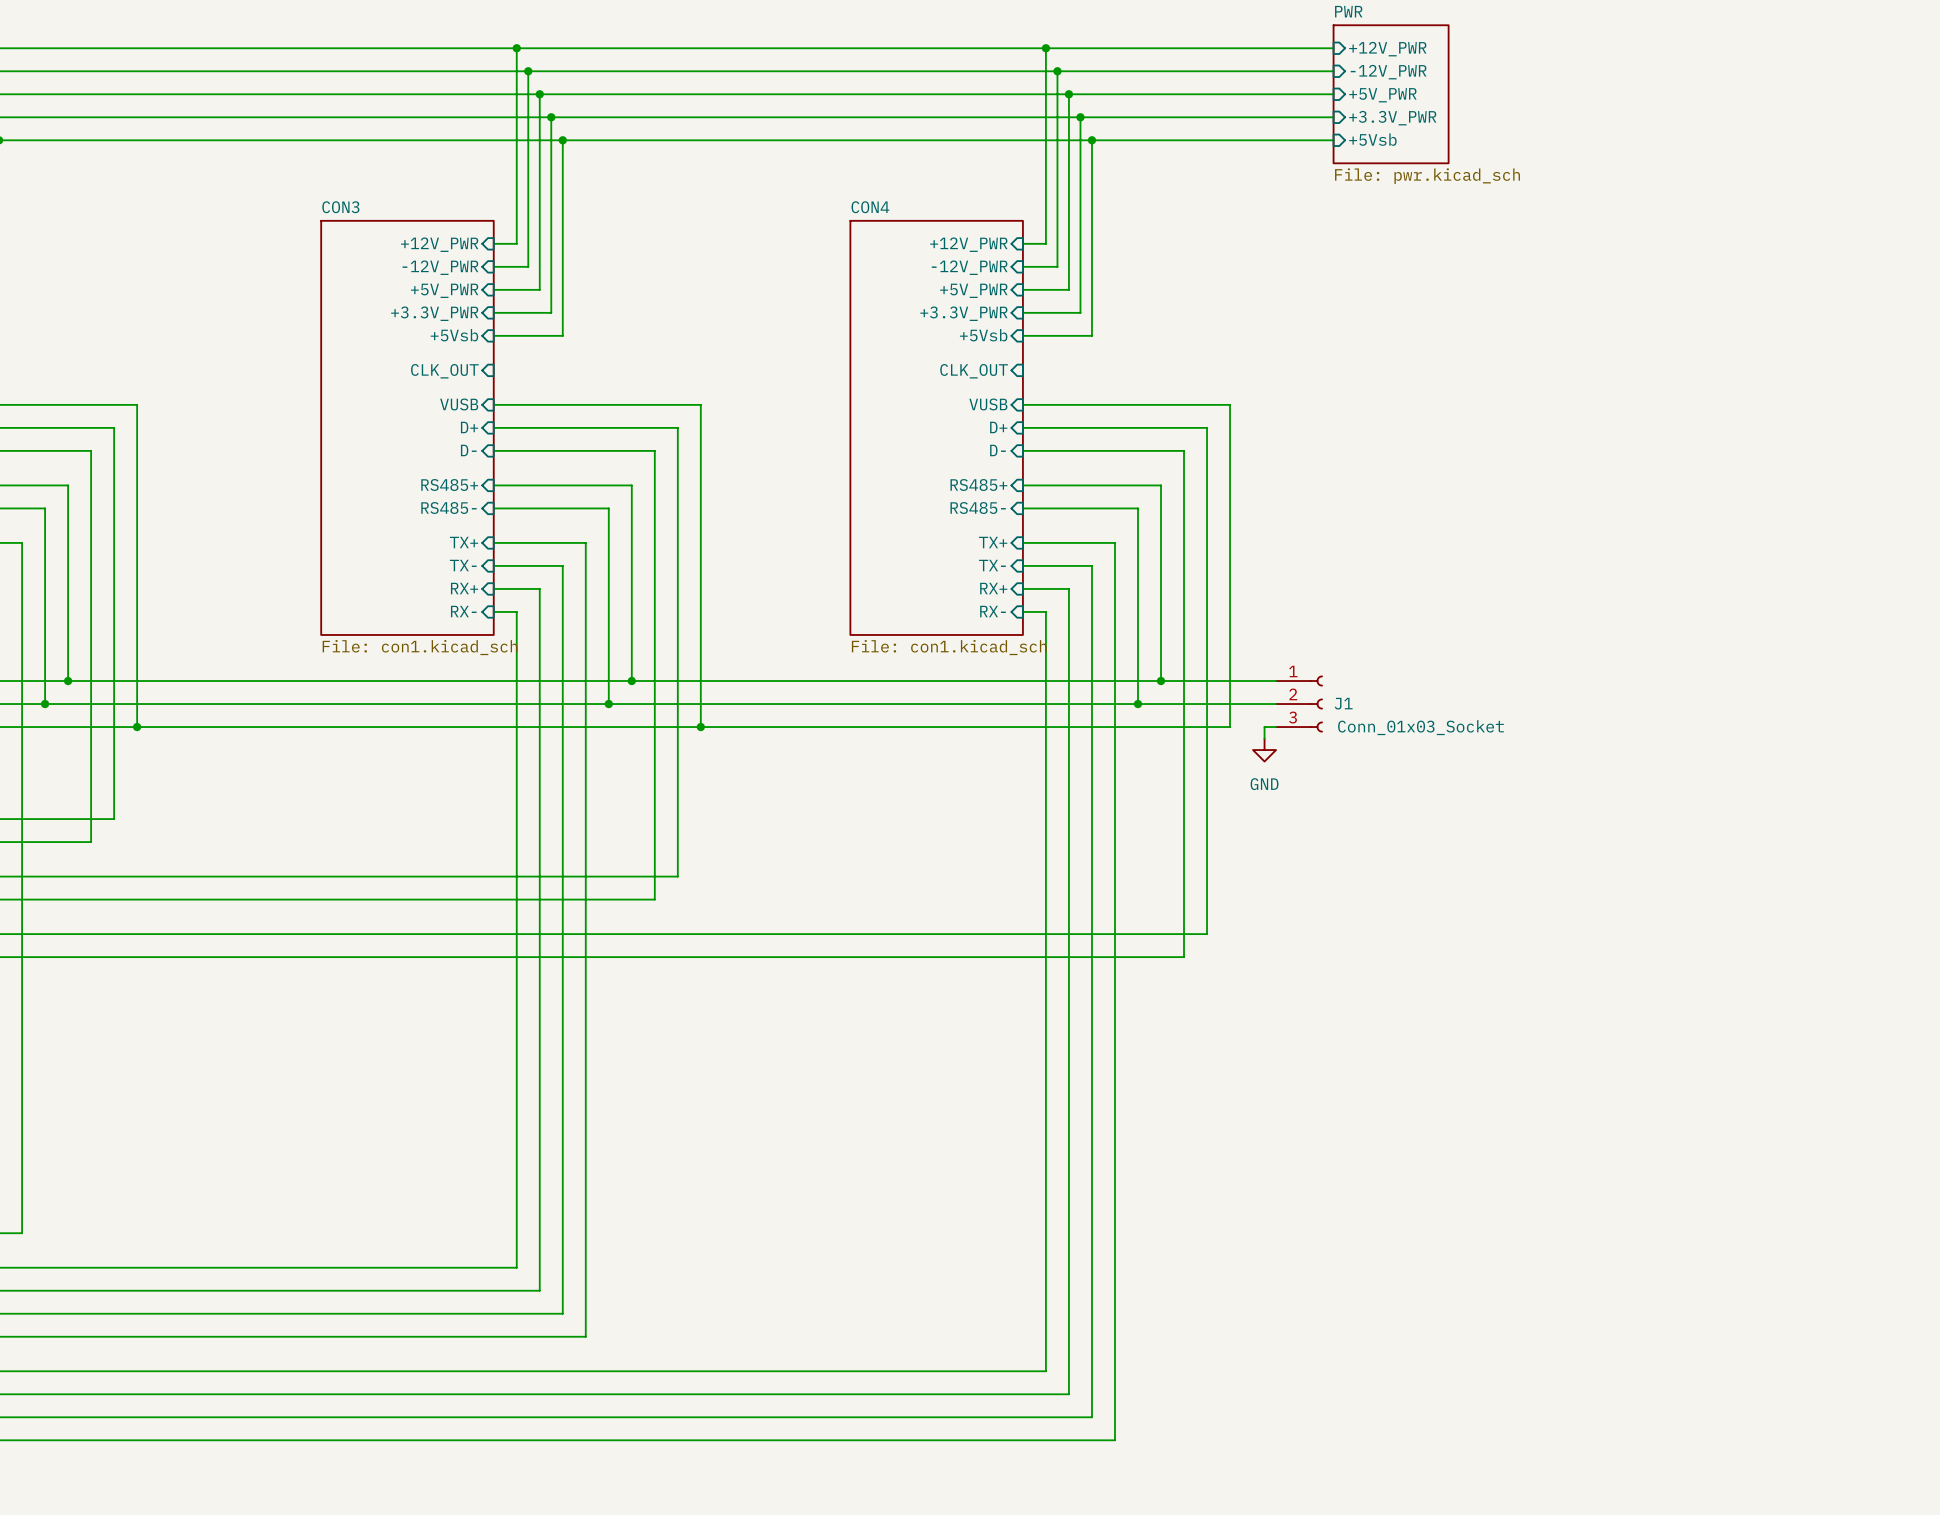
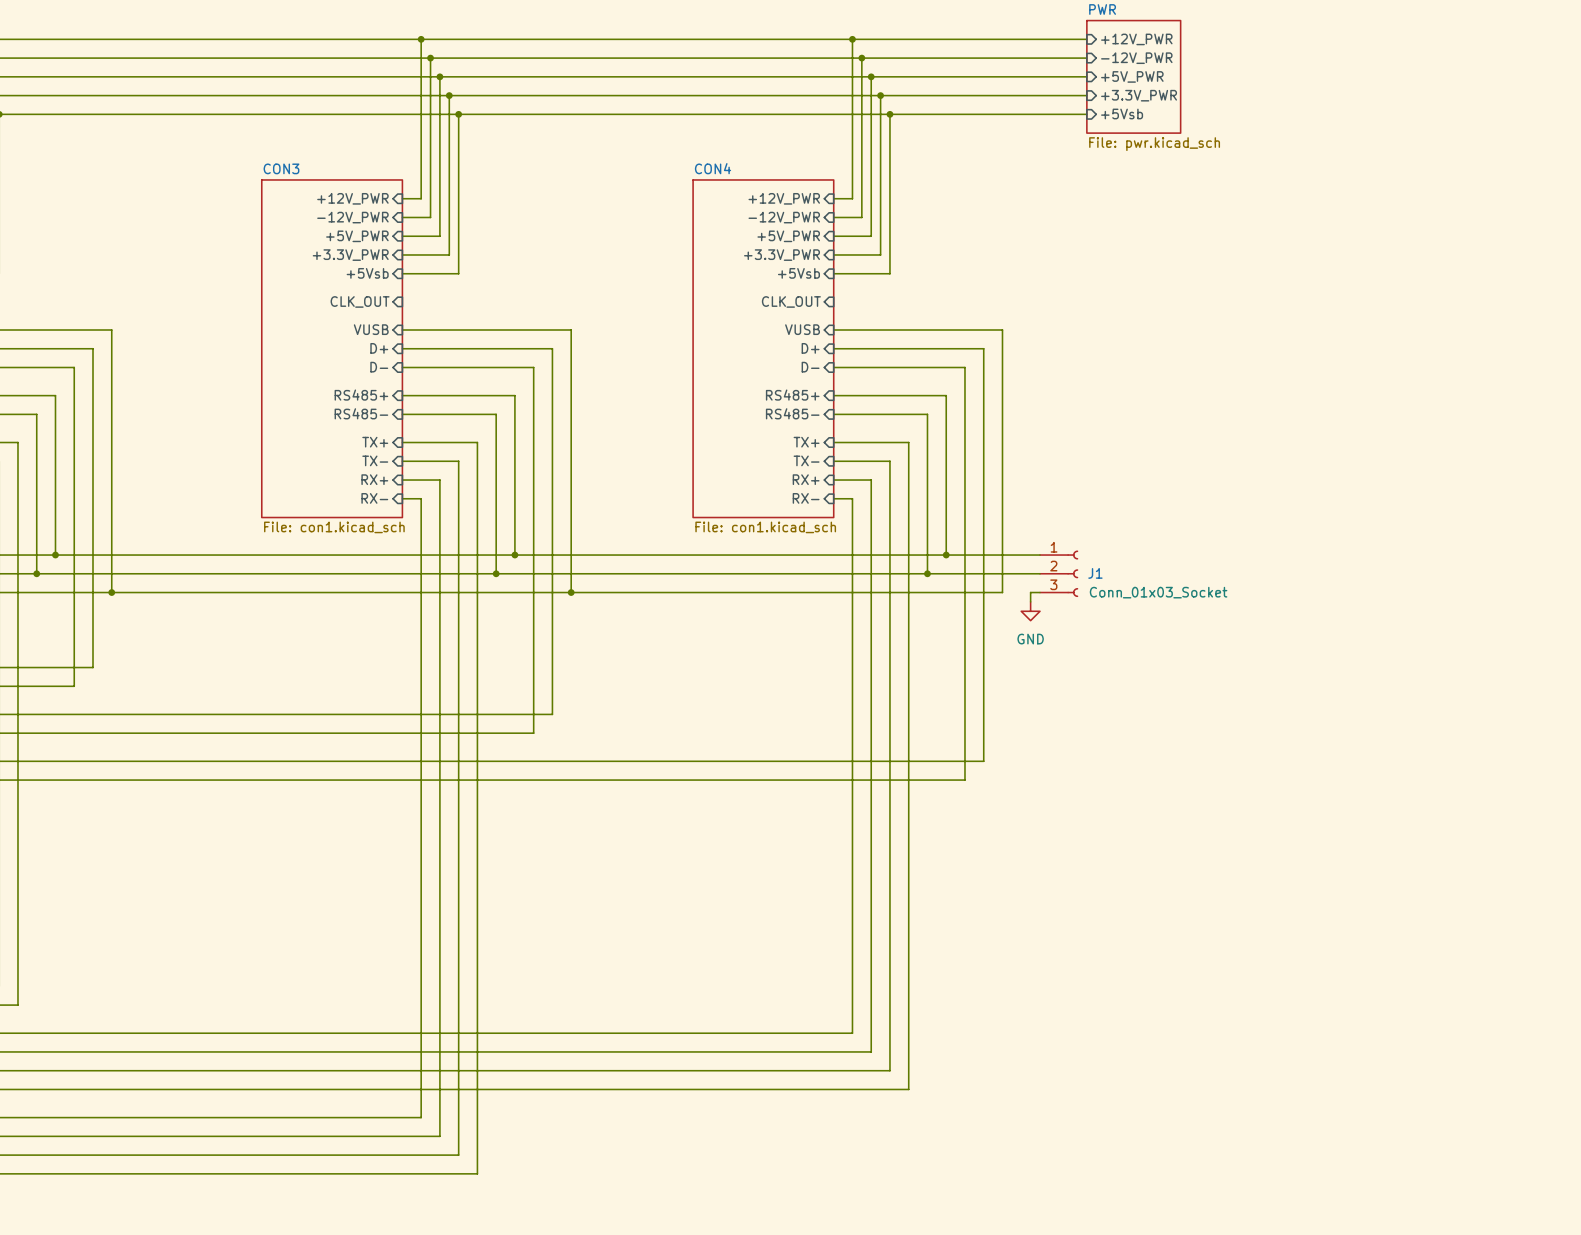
wire: (1045, 1267) (1045, 1371) (516, 1371) -> (852, 1033) (421, 1033) (421, 1117)
wire: (1068, 1290) (1068, 1394) (539, 1394) -> (871, 1051) (439, 1051) (439, 1136)
wire: (1091, 1313) (1091, 1417) (562, 1417) -> (889, 1070) (458, 1070) (458, 1155)
wire: (1114, 1336) (1114, 1440) (585, 1440) -> (908, 1089) (477, 1089) (477, 1173)

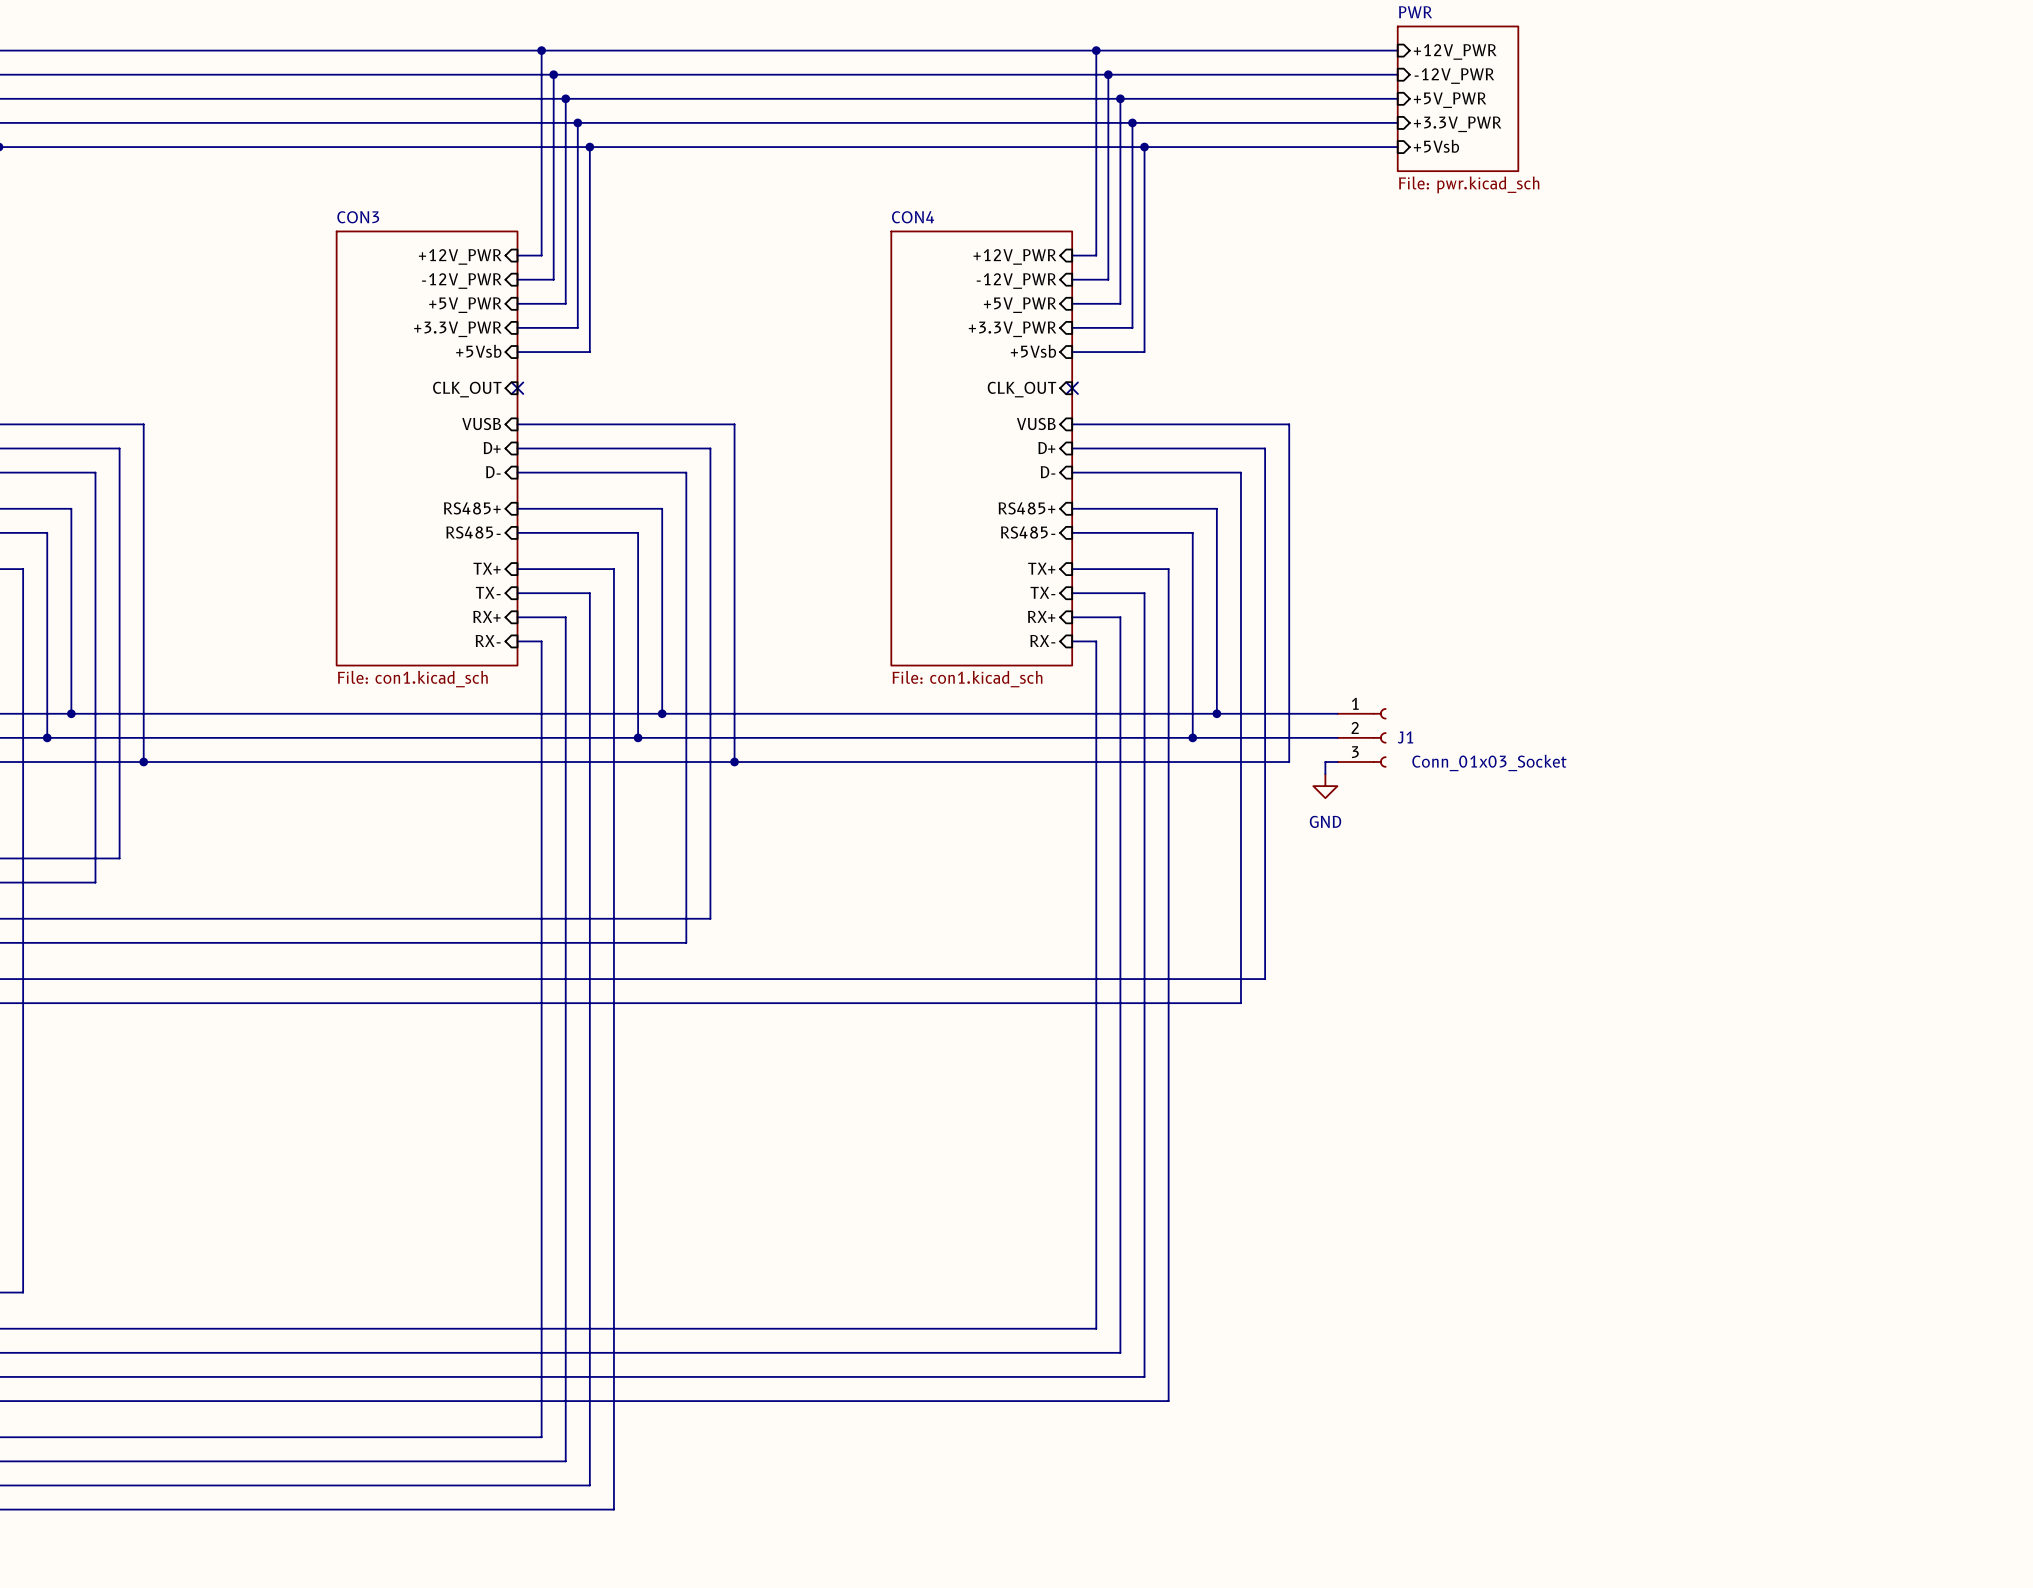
no-connect mark: none -> (517, 388)
no-connect mark: none -> (1072, 388)

